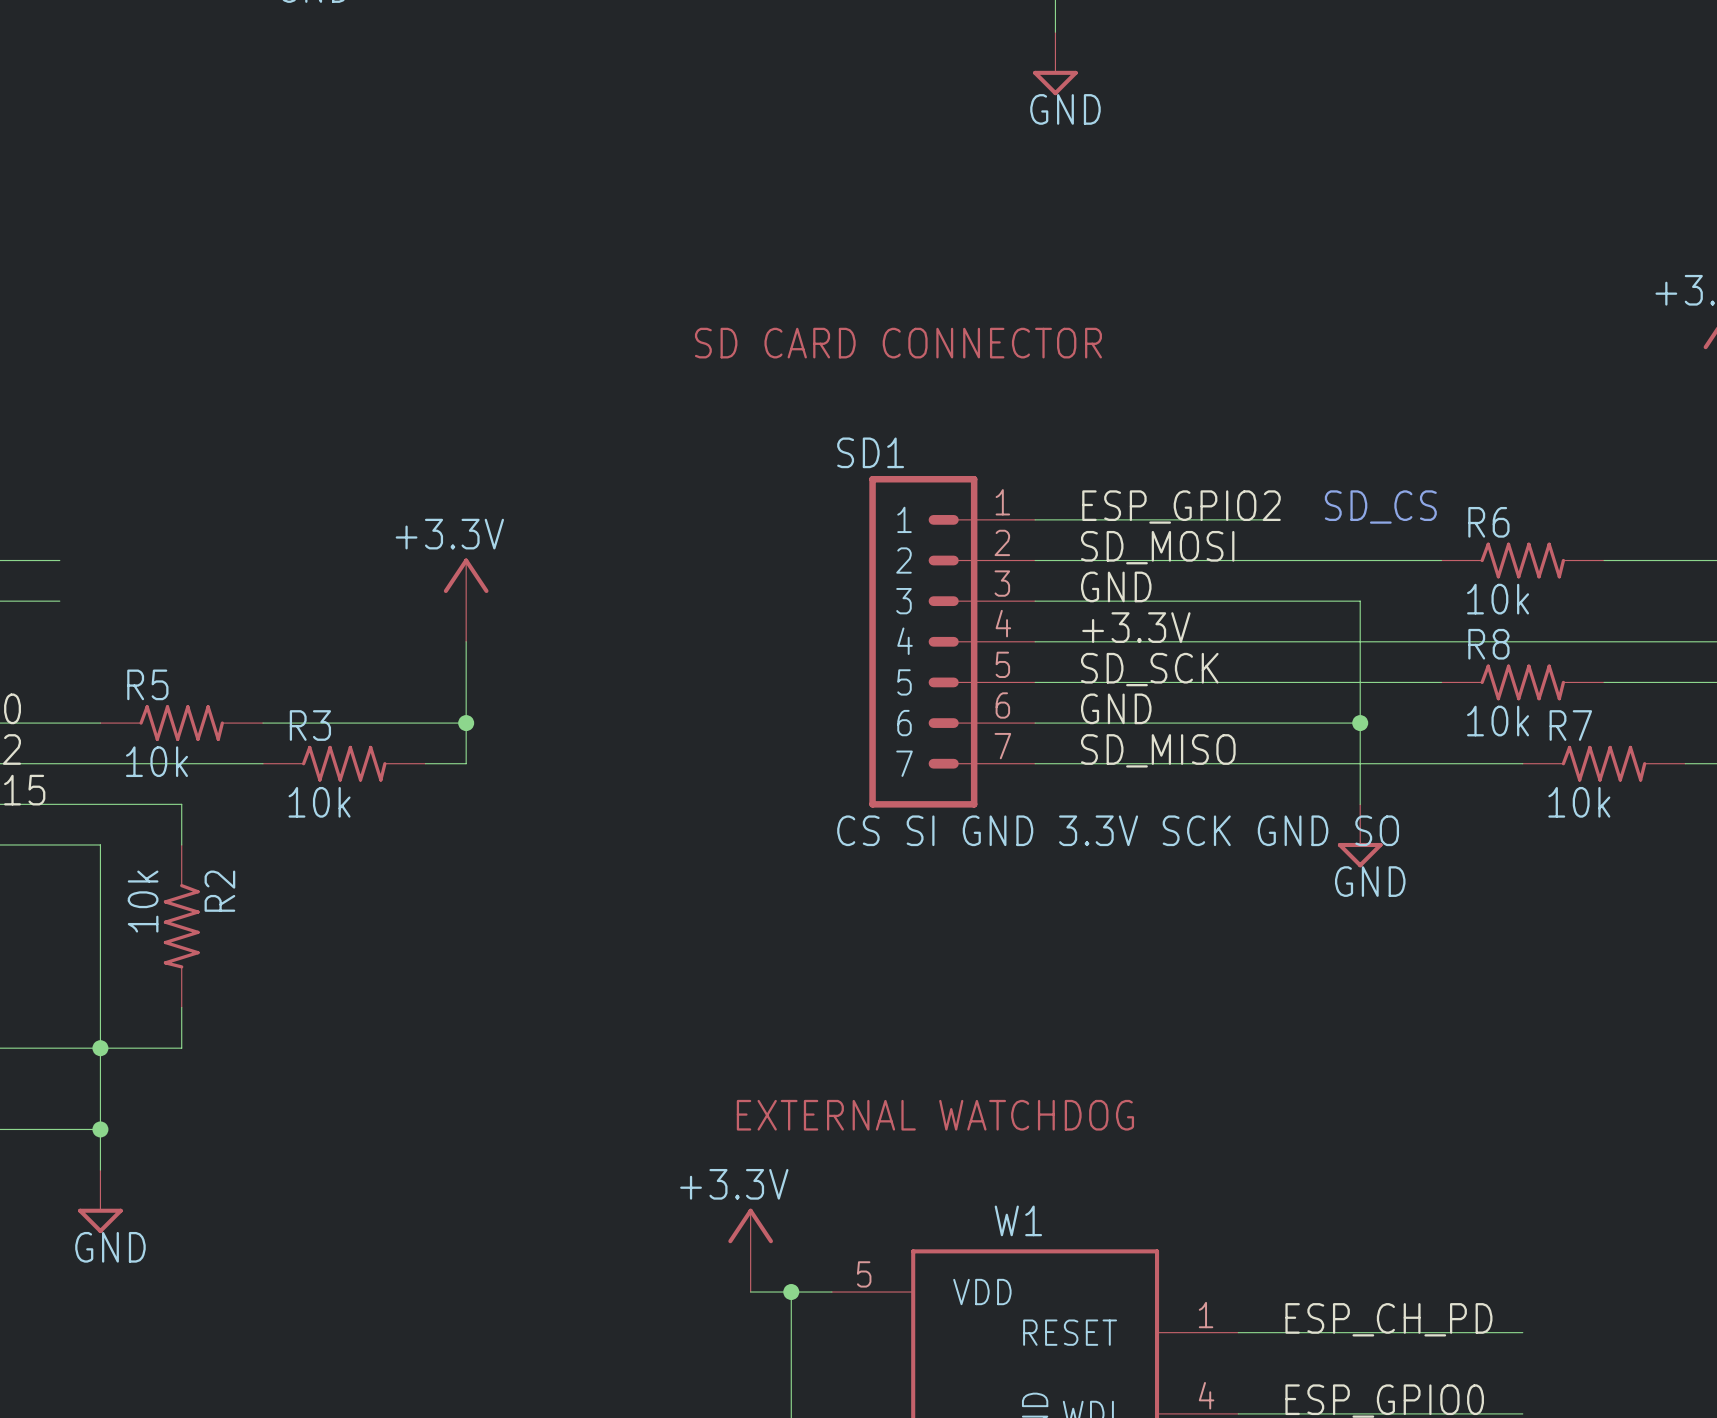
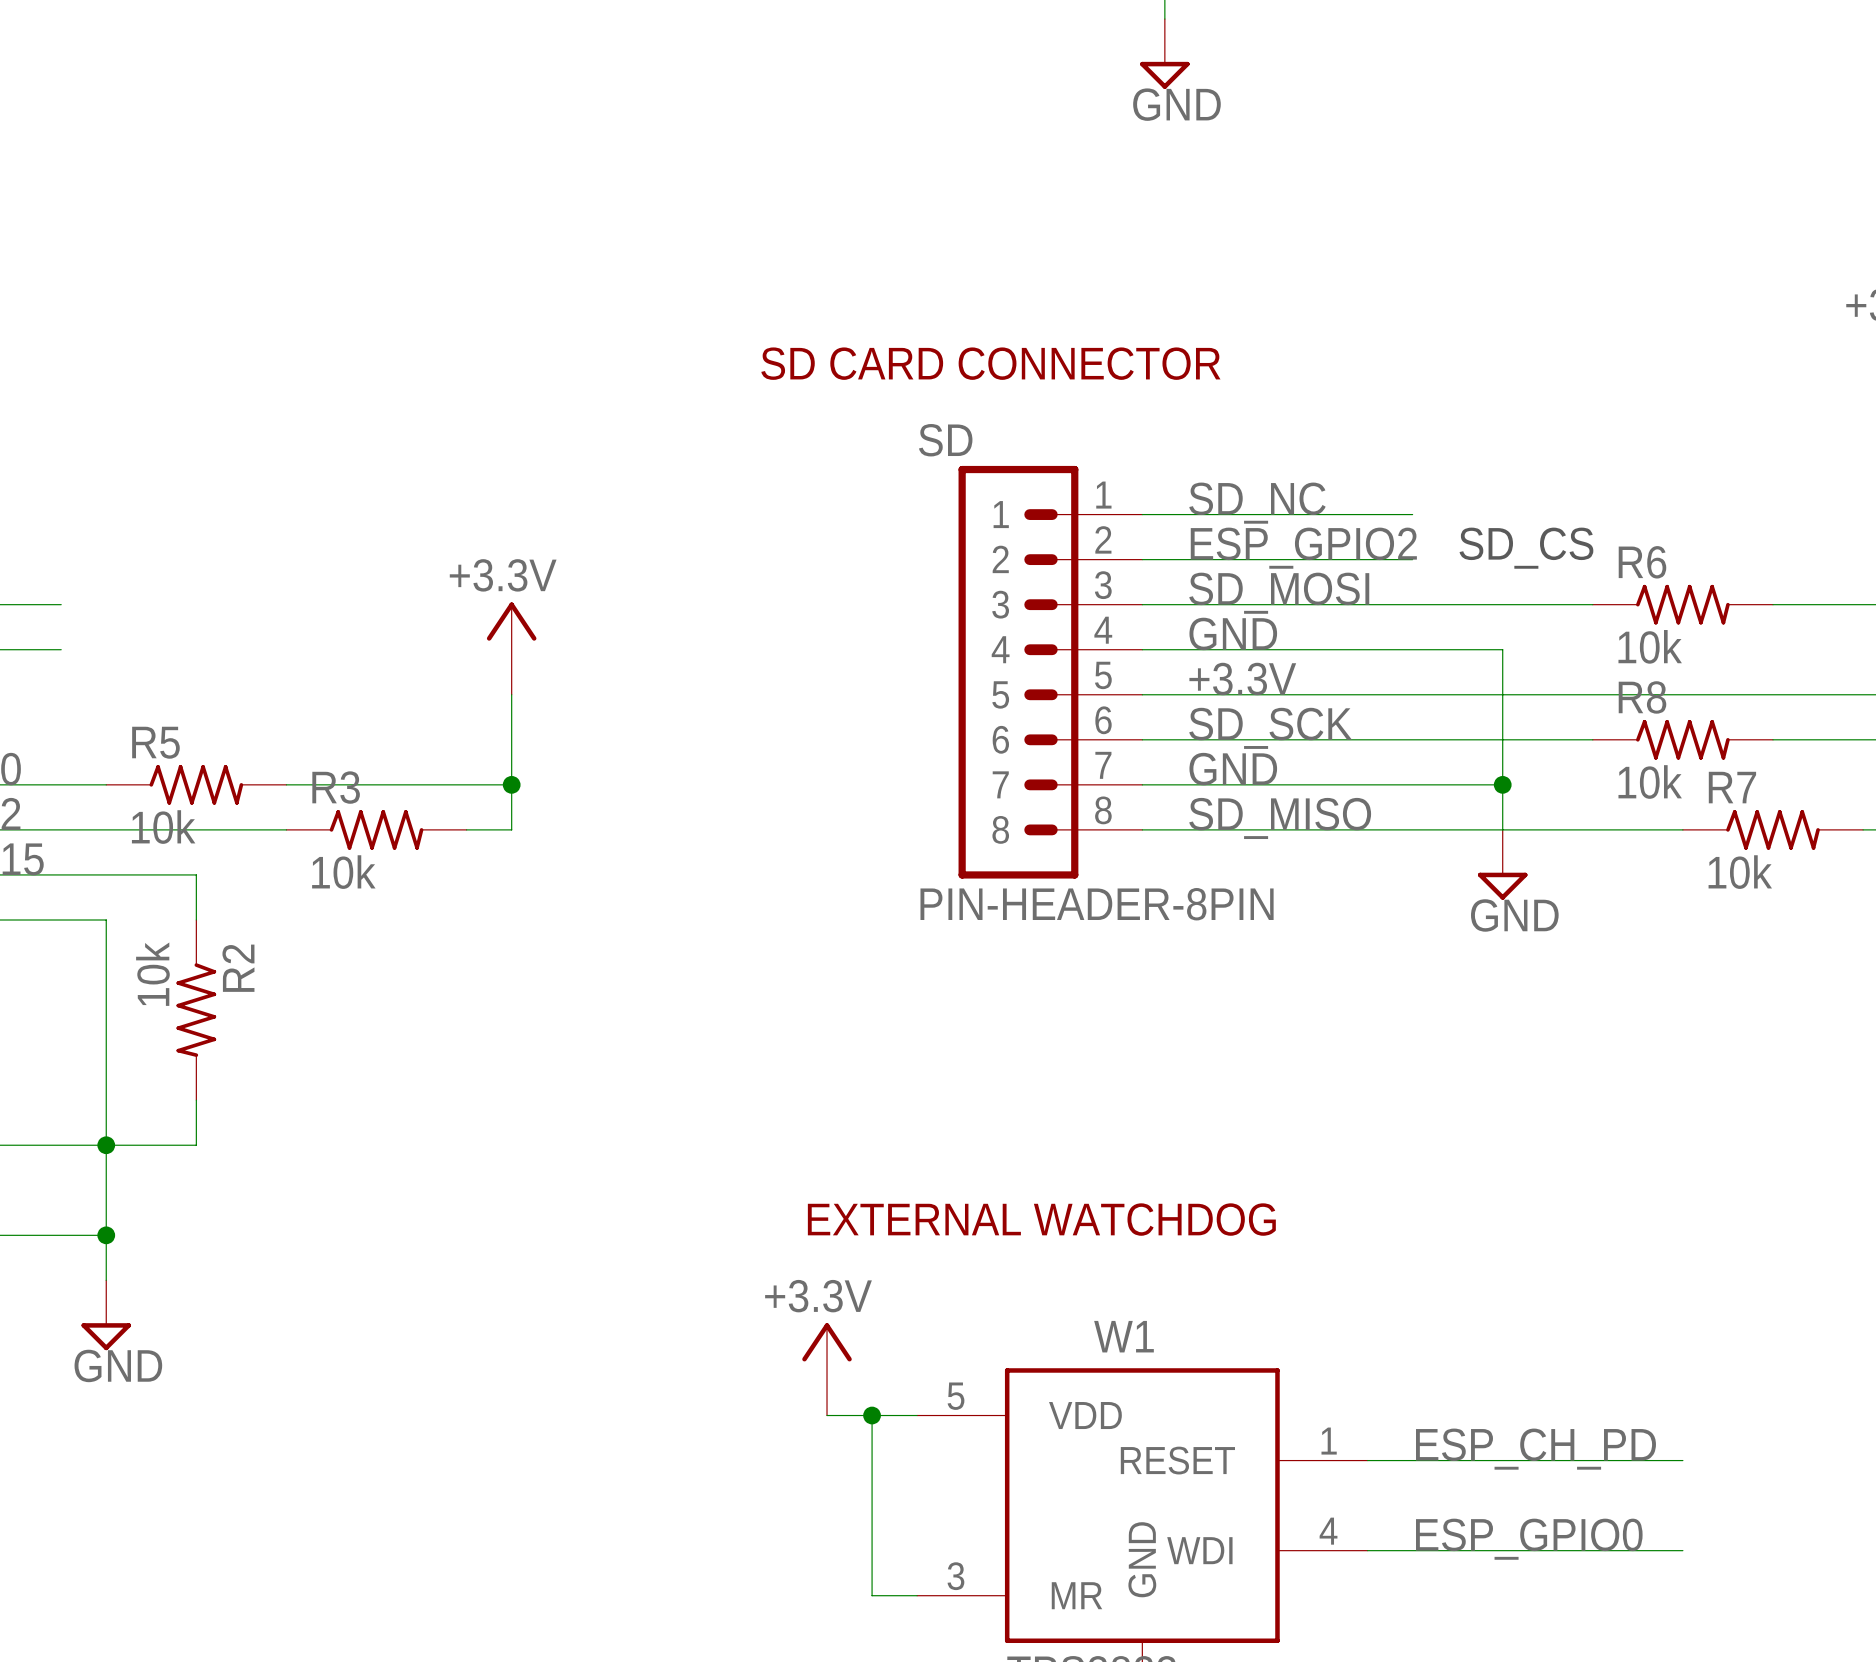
label: none -> SD_NC (1257, 503)
wire: none -> (1142, 514) (1412, 514)
SD: none -> PIN-HEADER-8PIN (1050, 672)
SD1: CS SI GND 3.3V SCK GND SO (952, 641) -> none
power symbol position: GND (1360, 835) -> GND (1502, 864)

